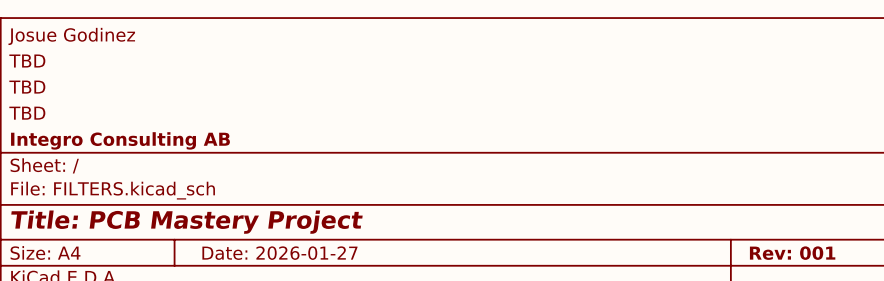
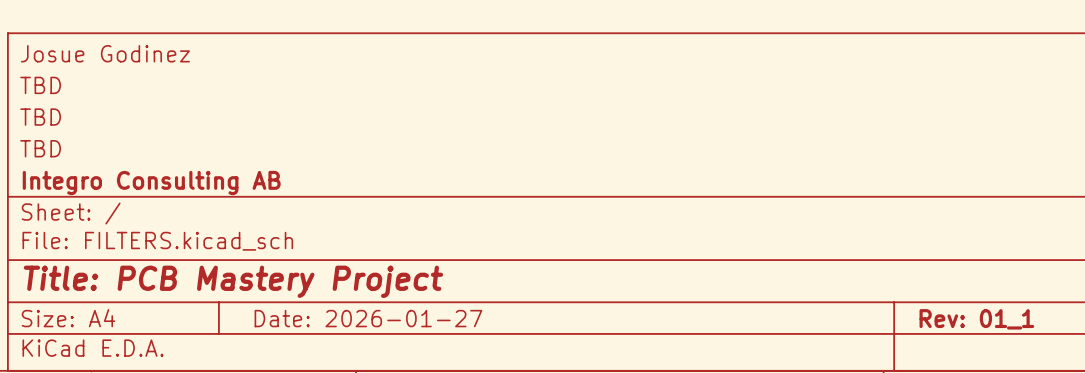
title block: Rev: 001 (792, 253) -> Rev: 01_1 (976, 319)

